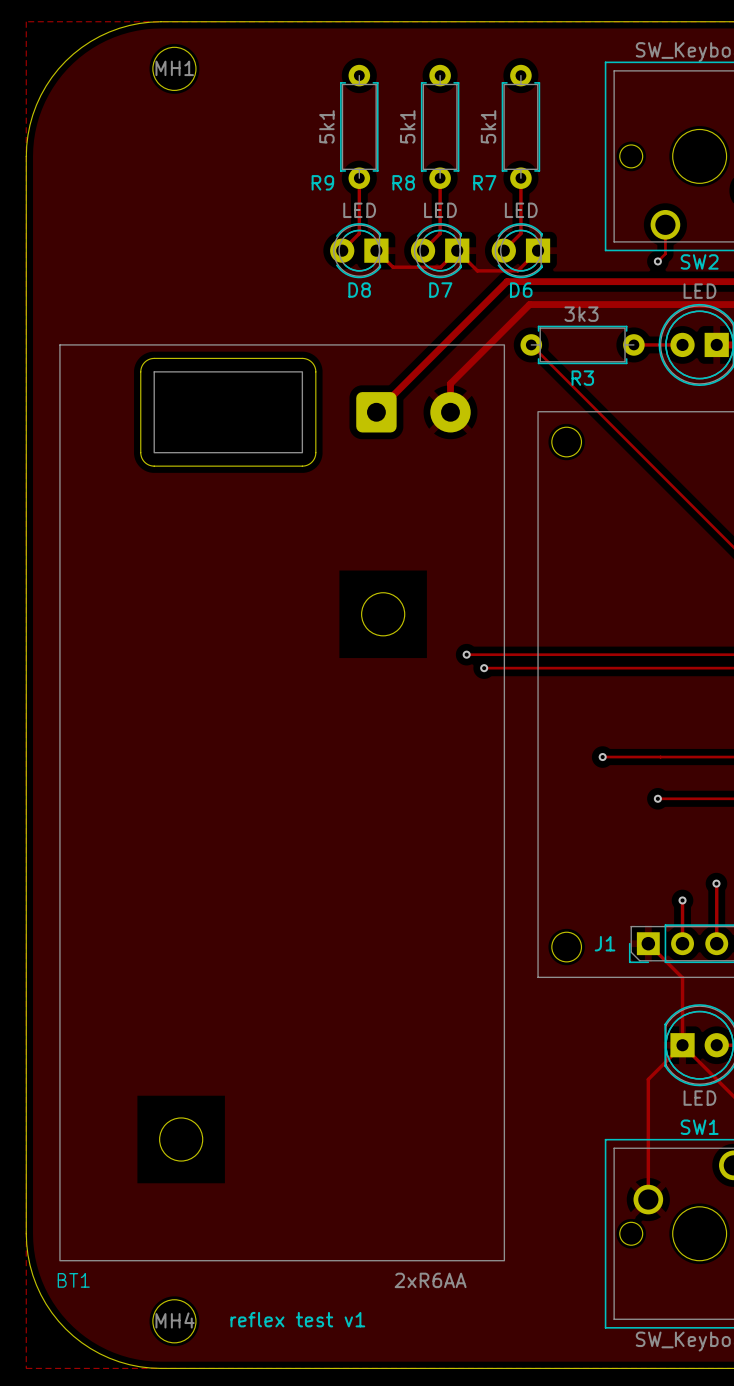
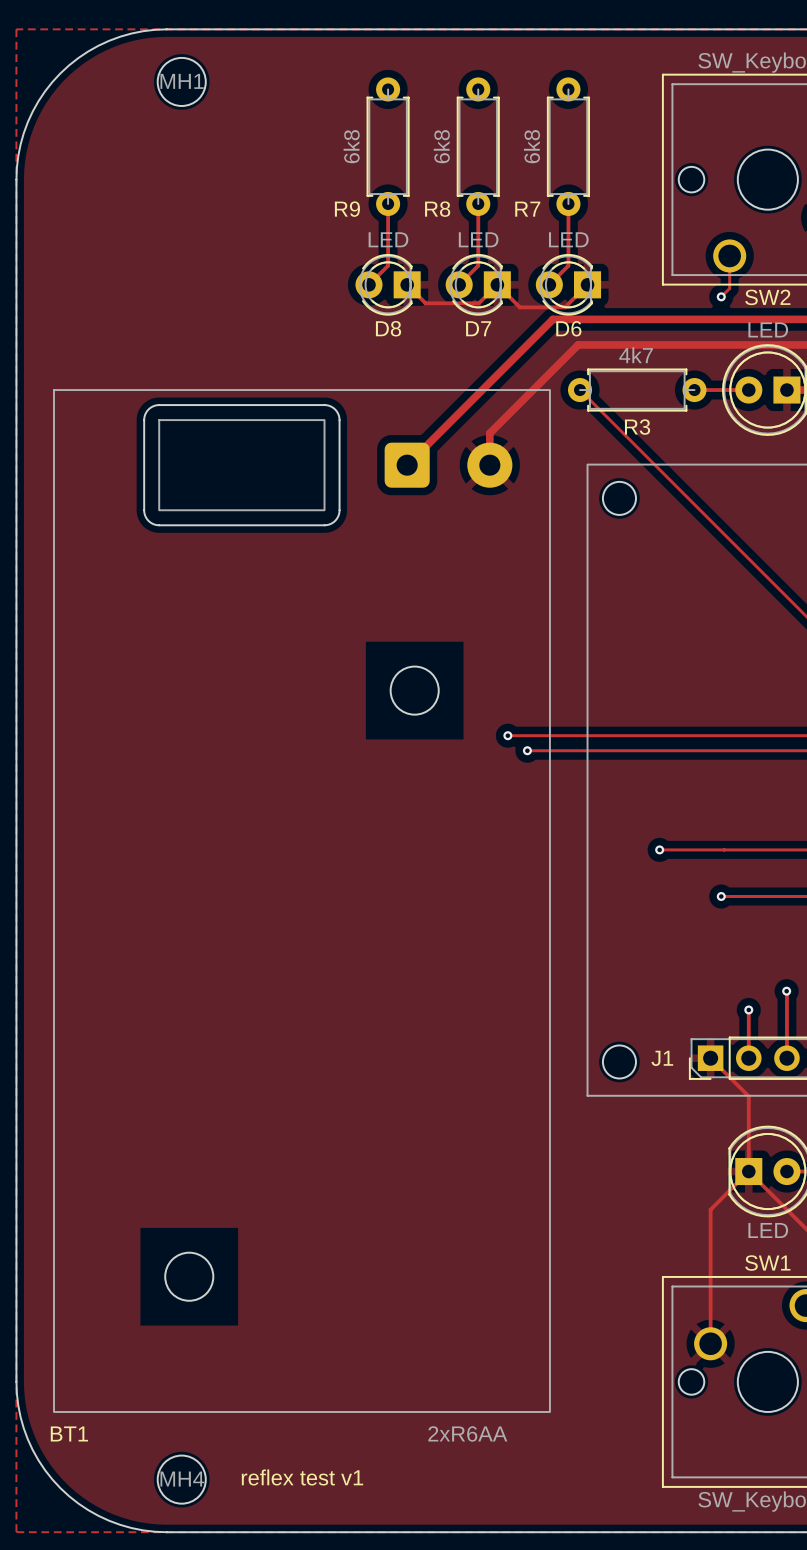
R9 value: 5k1 (326, 126) -> 6k8 (351, 146)
R8 value: 5k1 (407, 126) -> 6k8 (441, 146)
R7 value: 5k1 (488, 126) -> 6k8 (531, 146)
R3 value: 3k3 (581, 314) -> 4k7 (636, 355)

